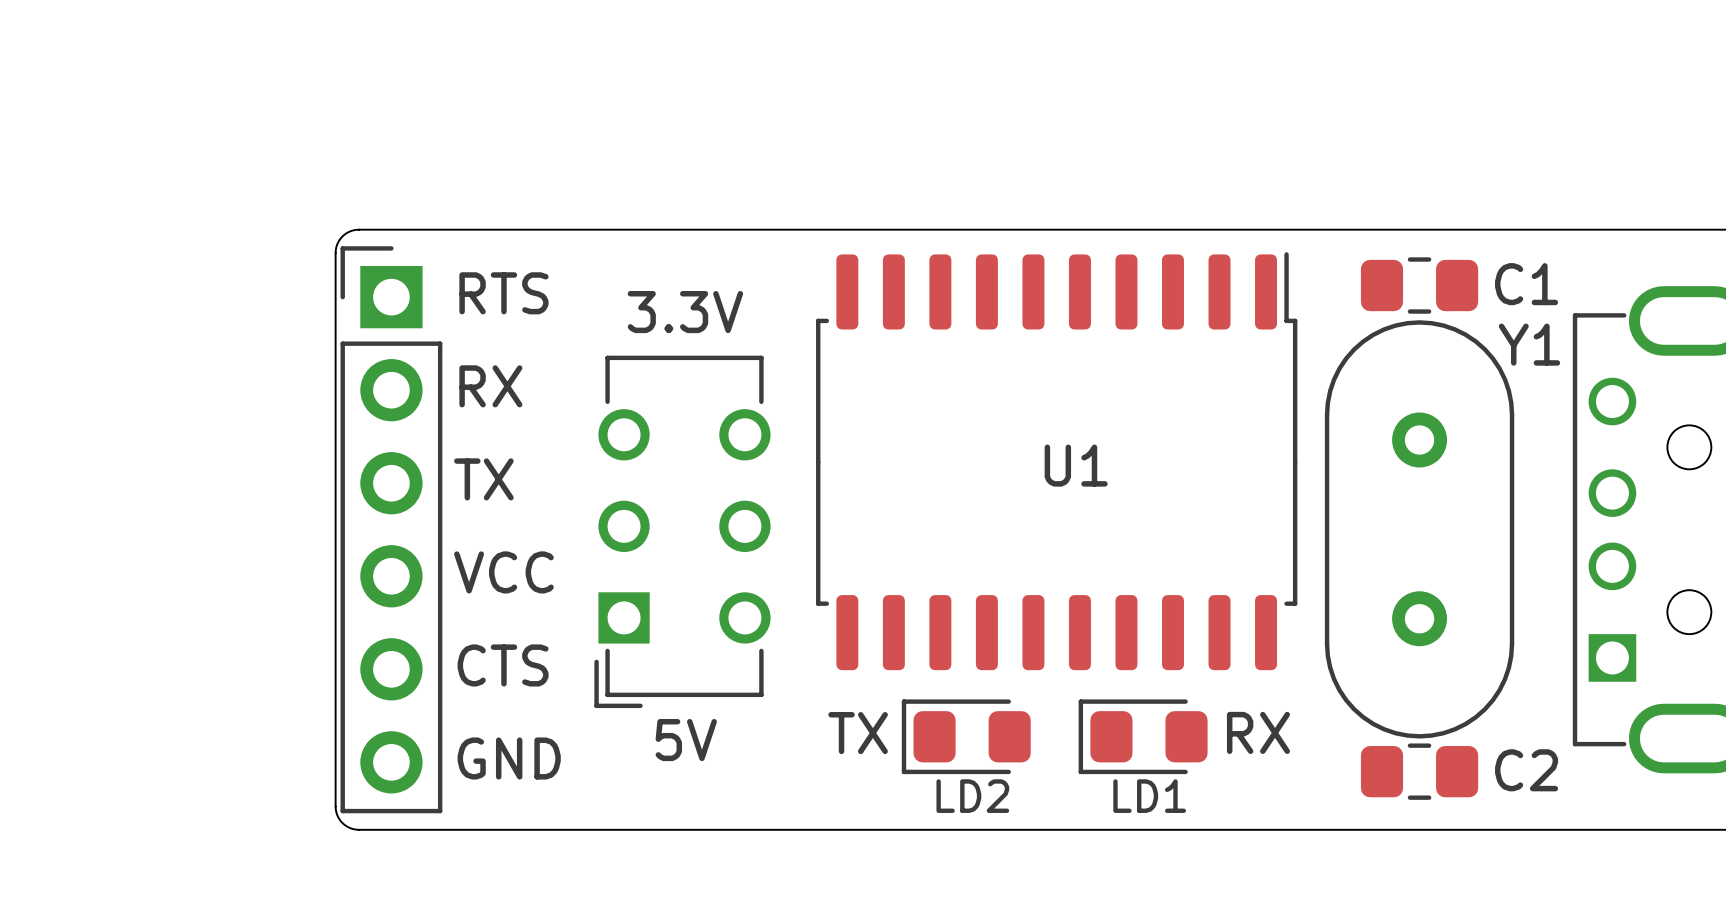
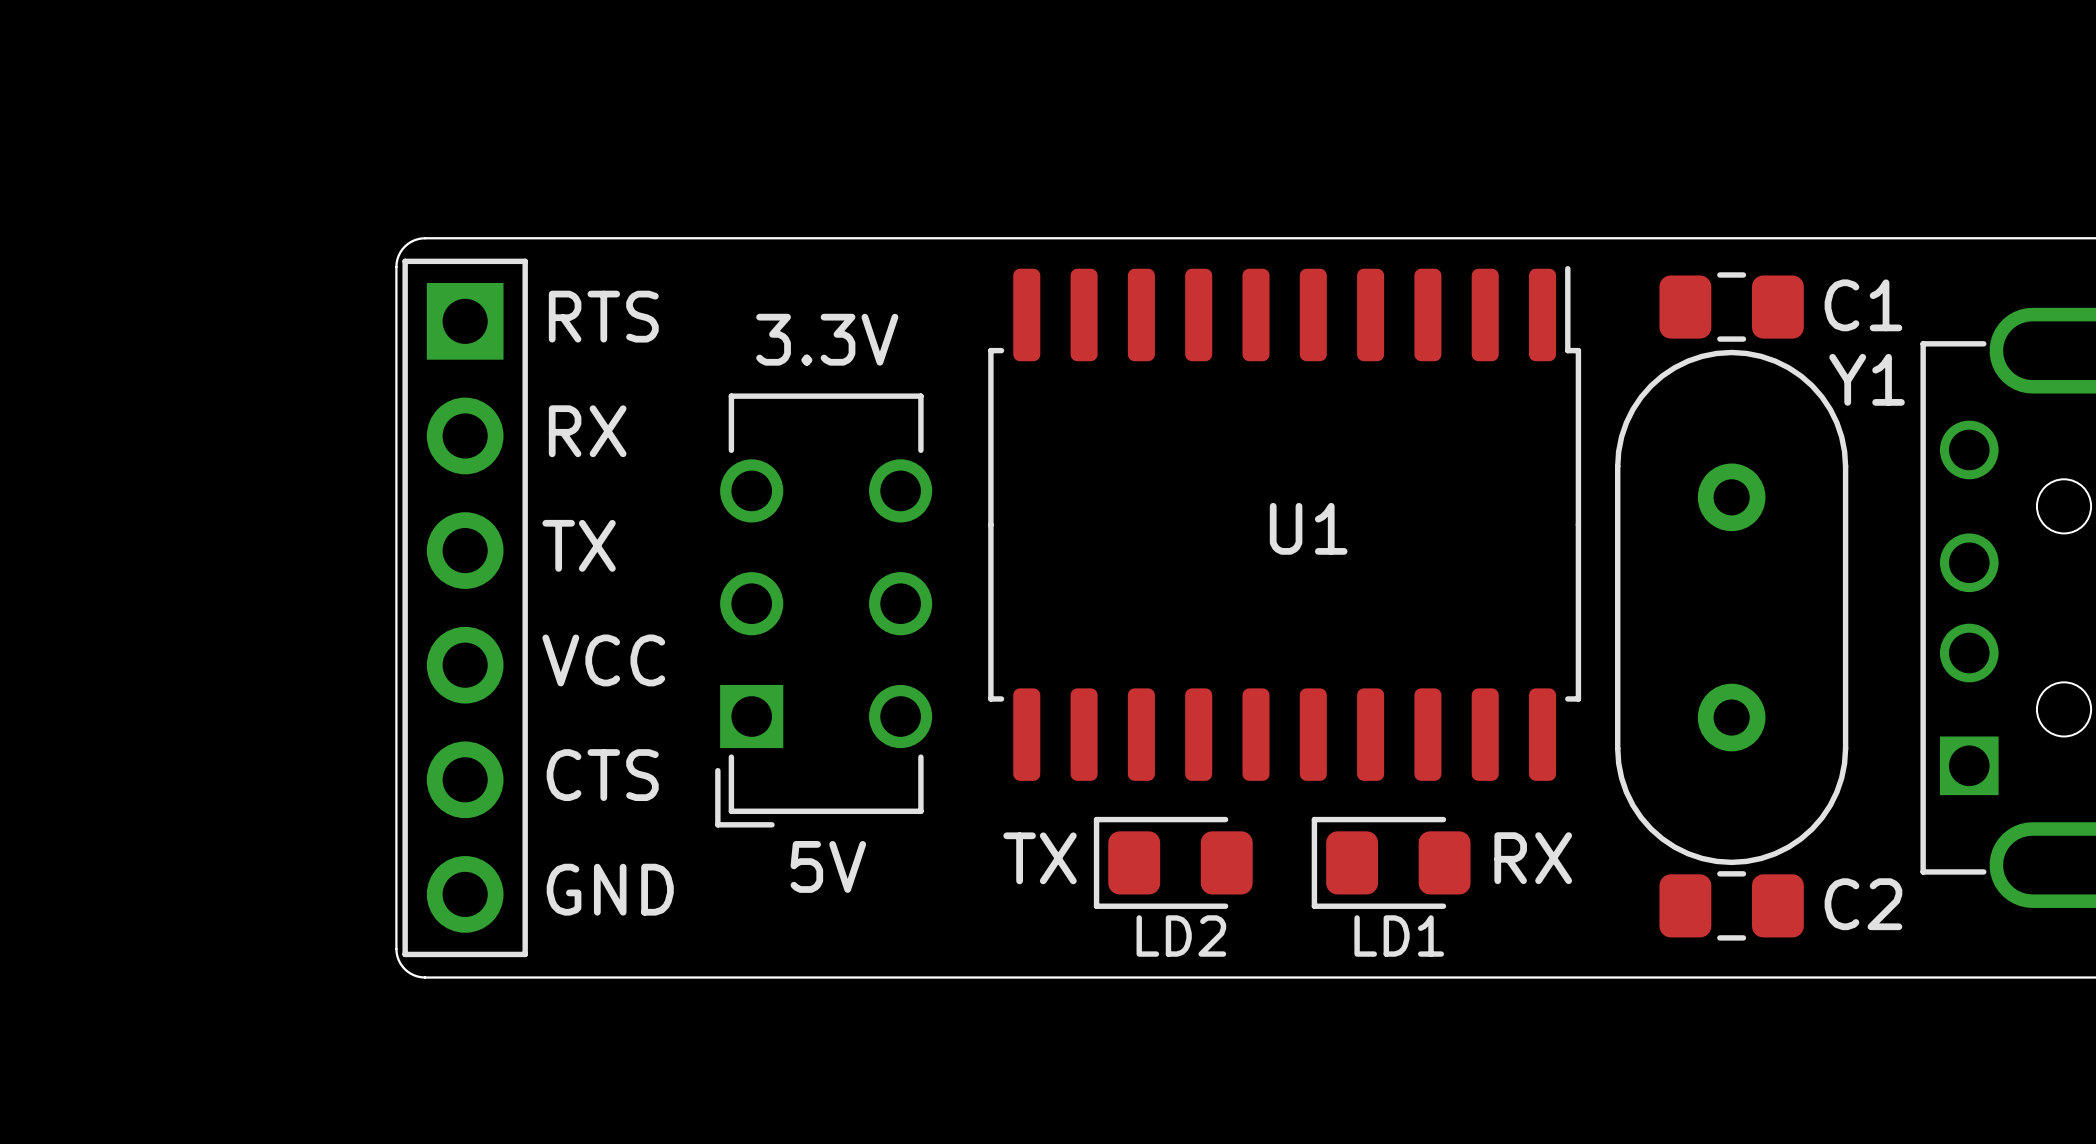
part footprint: [340, 246, 443, 814] -> [402, 258, 528, 958]

